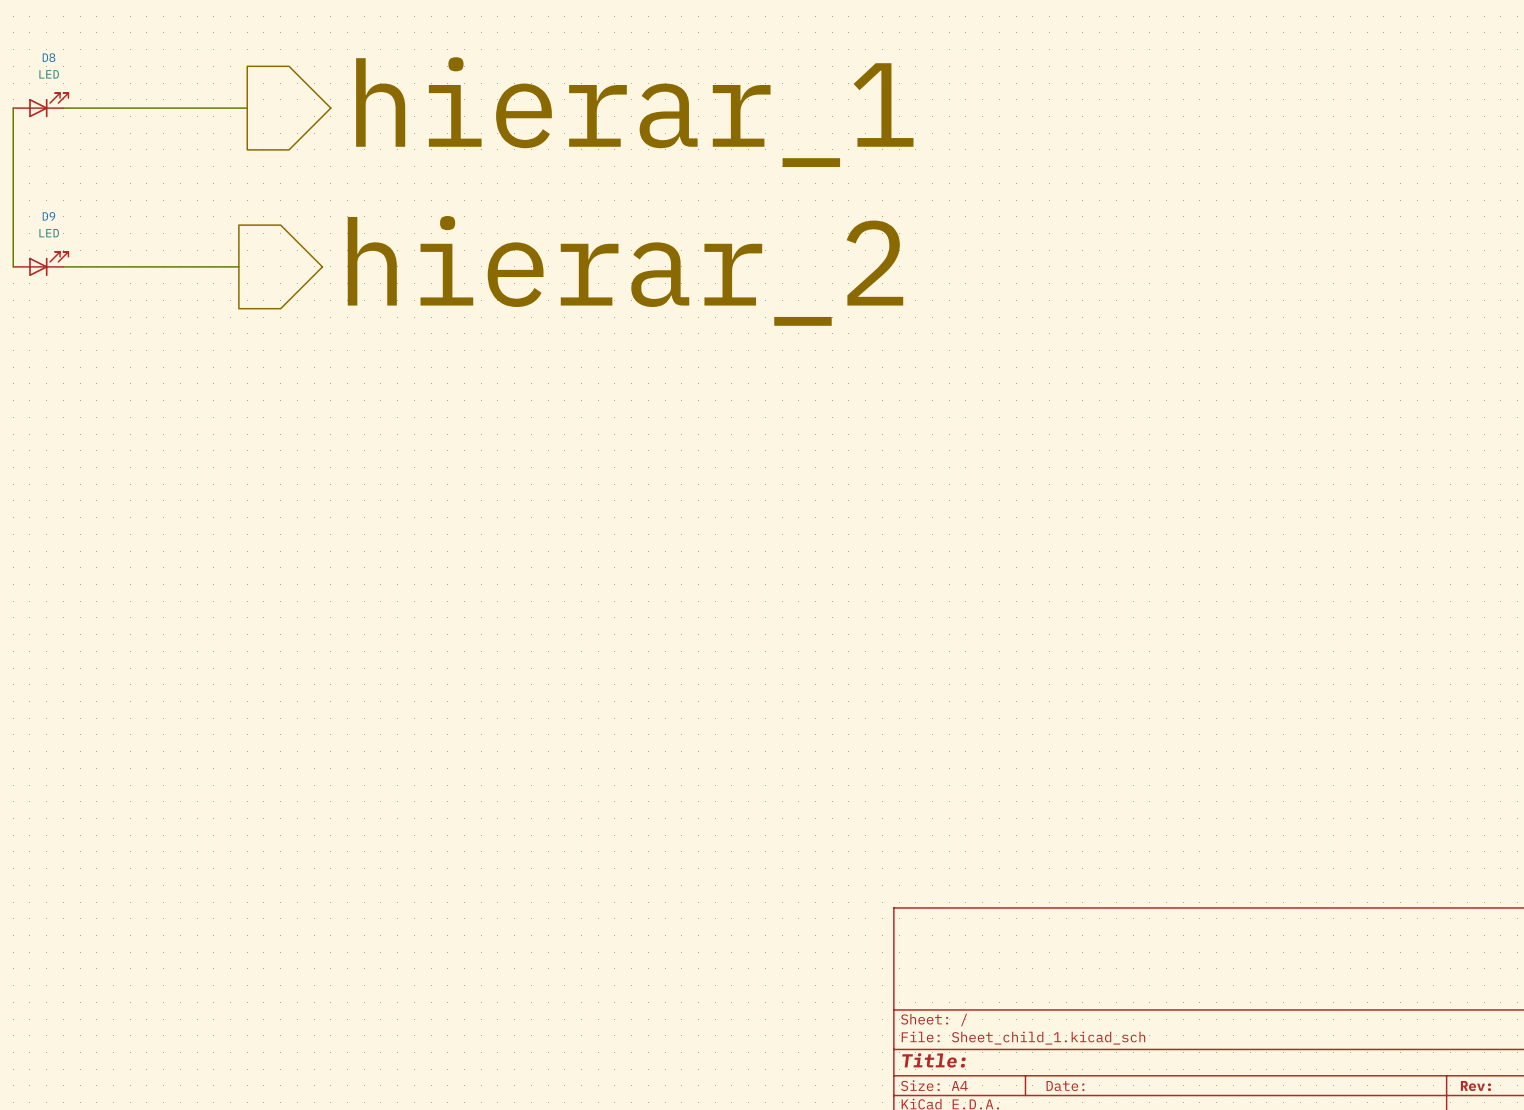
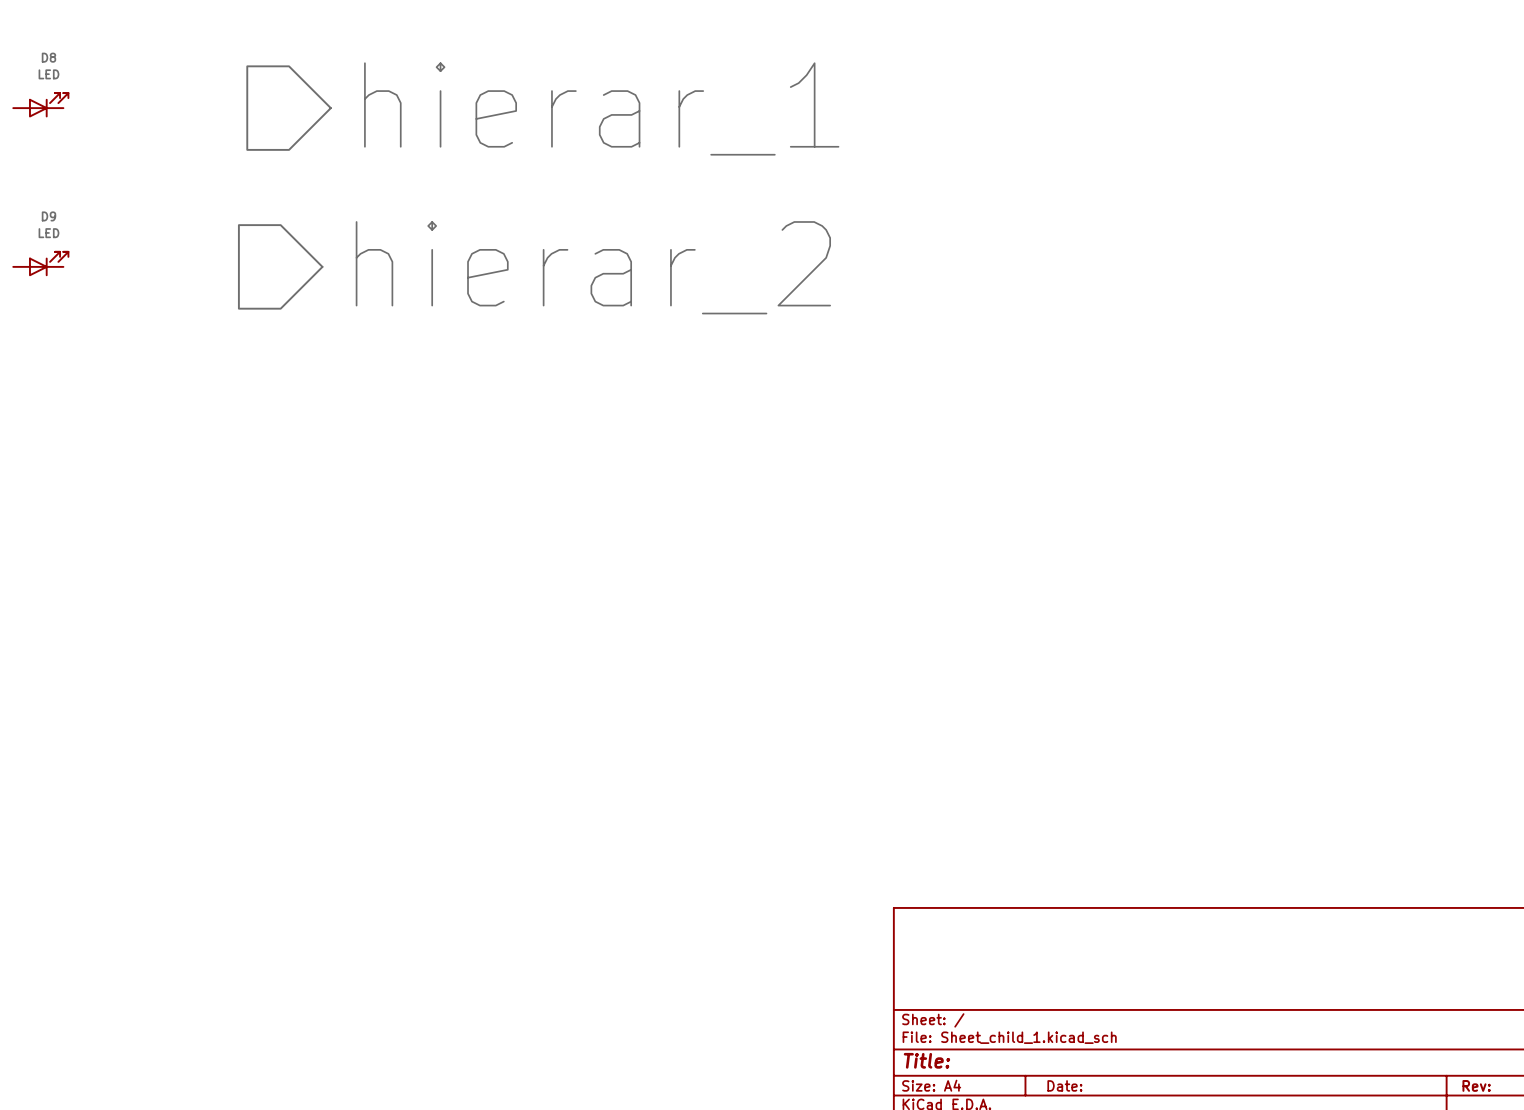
wire: (13, 108) (13, 266) -> none
wire: (63, 108) (247, 108) -> none
wire: (63, 266) (238, 266) -> none

